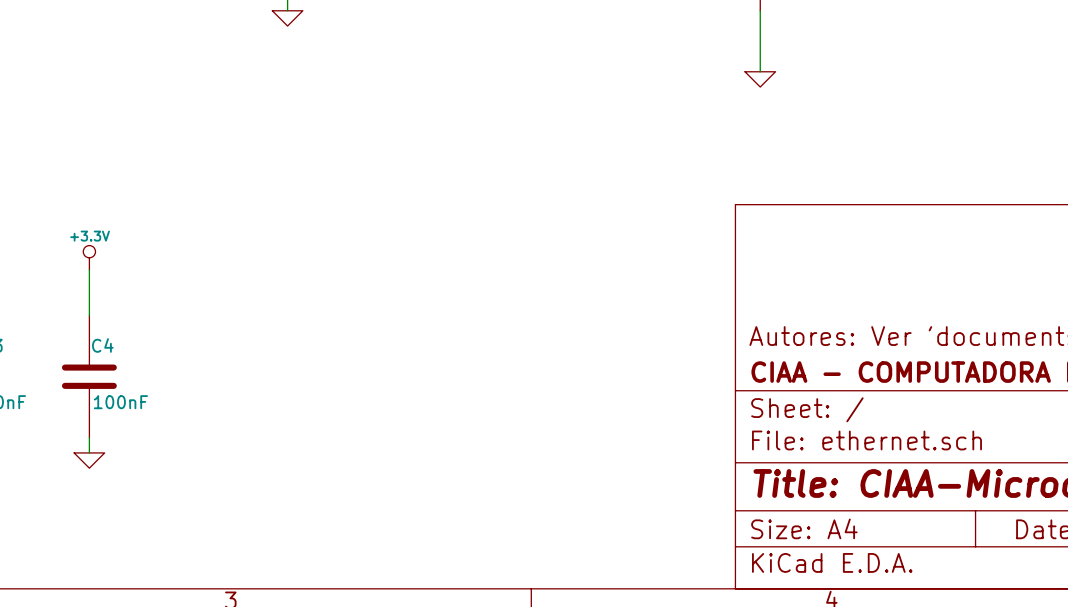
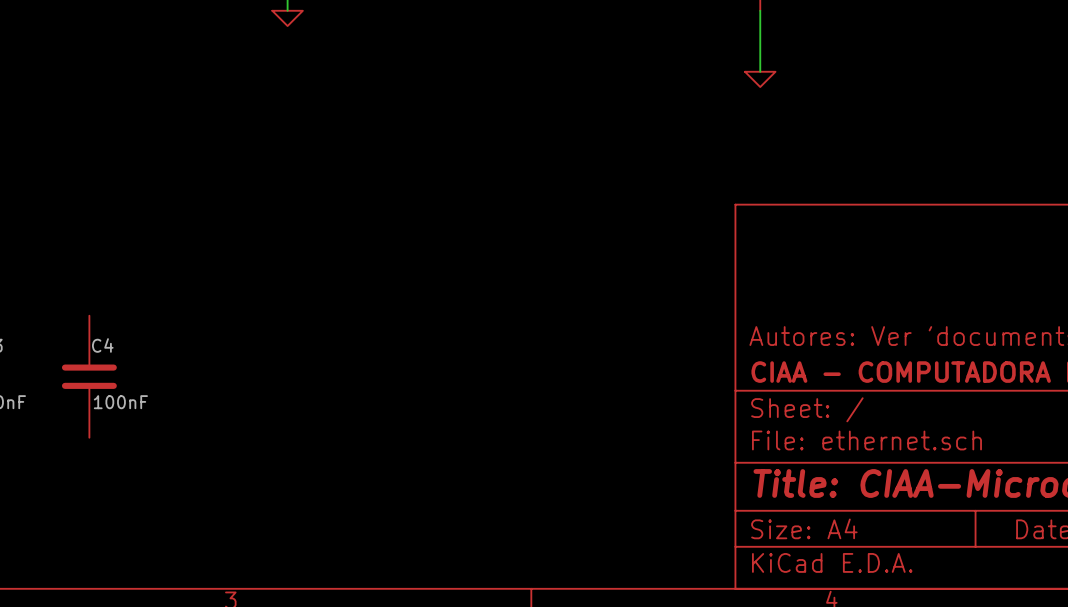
power symbol: +3.3V (89, 257) -> none
wire: (89, 269) (89, 315) -> none
wire: (89, 437) (89, 452) -> none
power symbol: (89, 460) -> none

